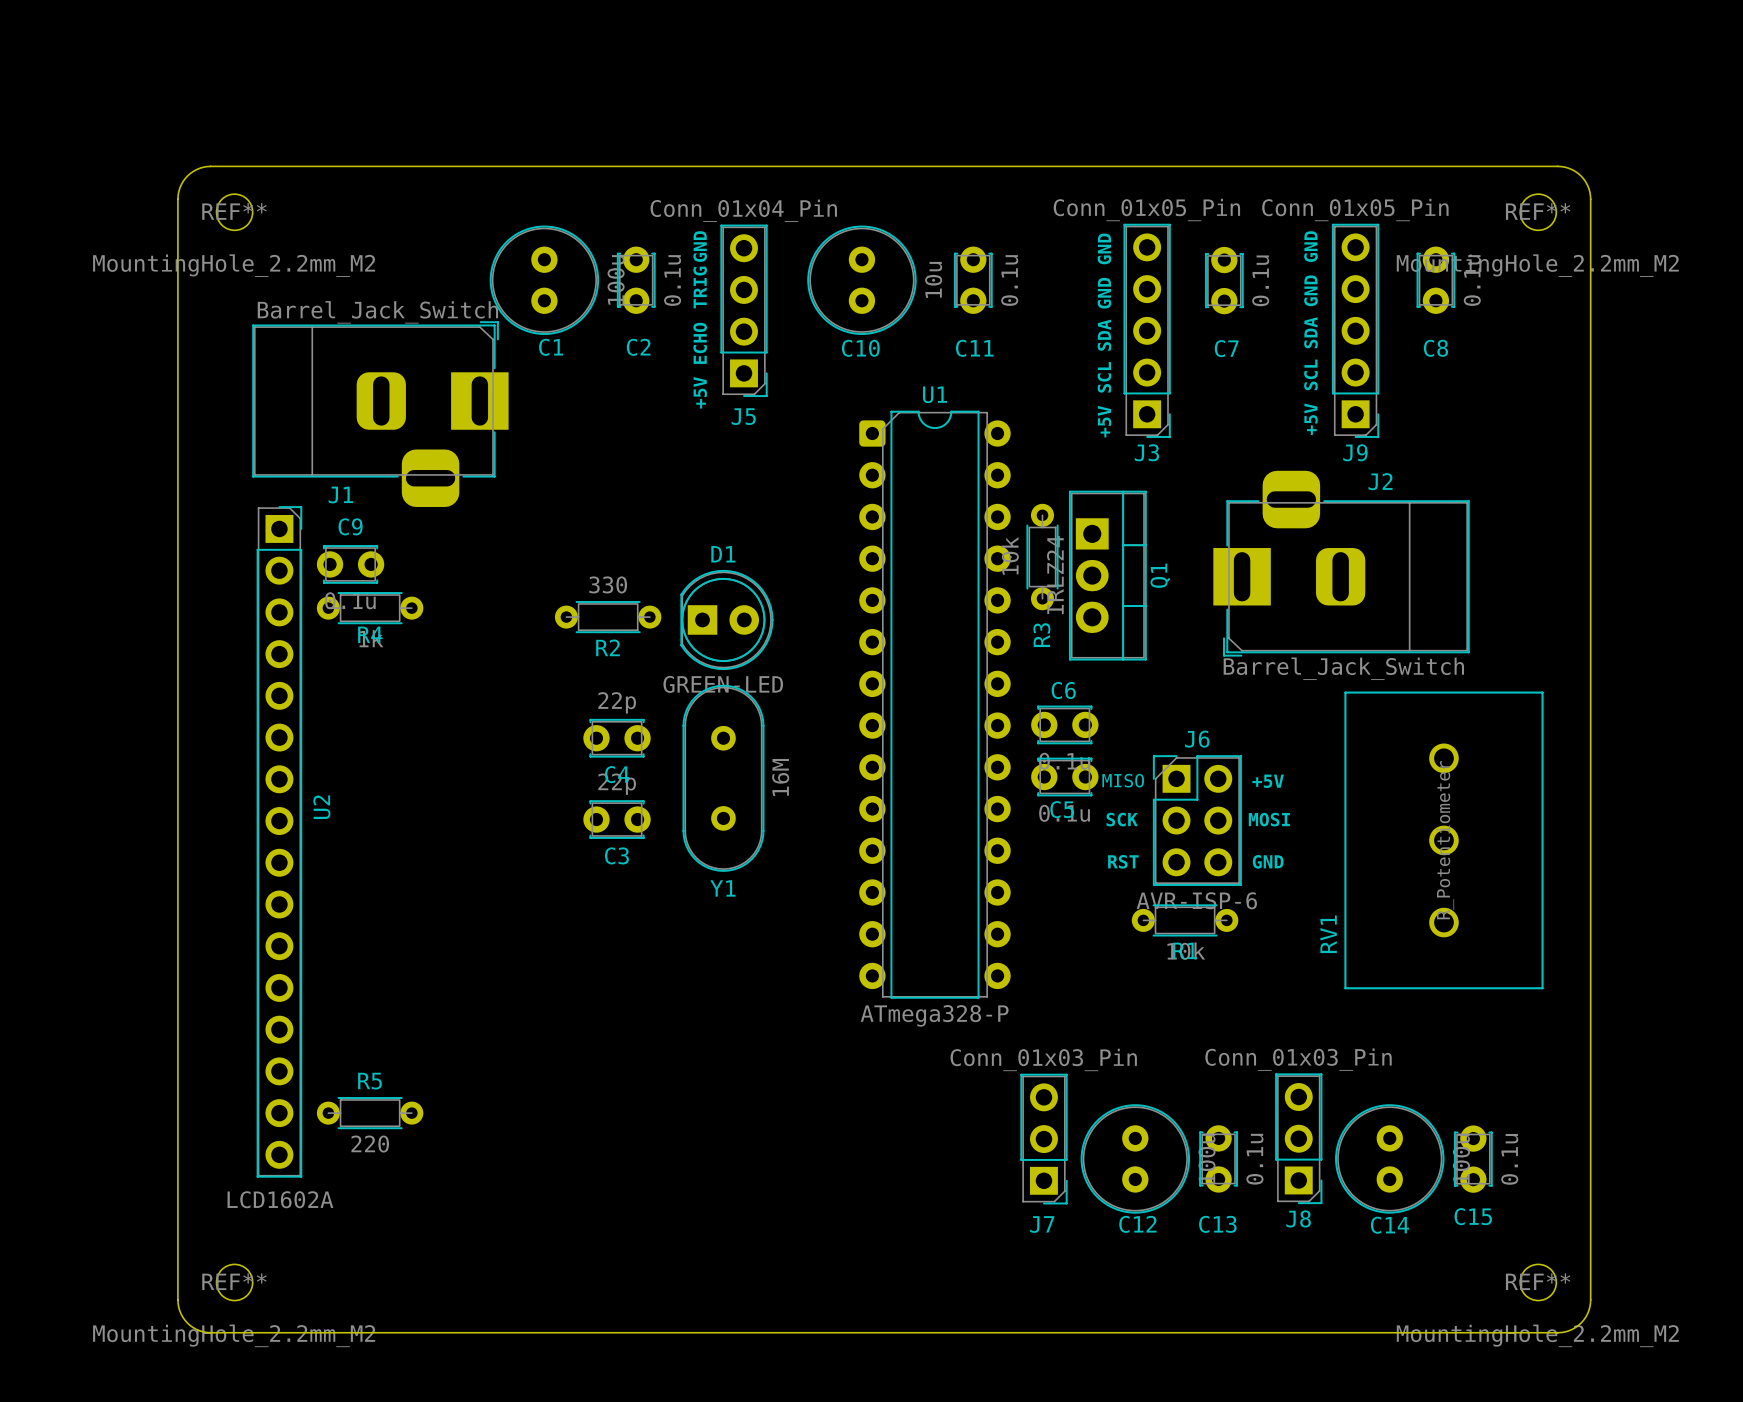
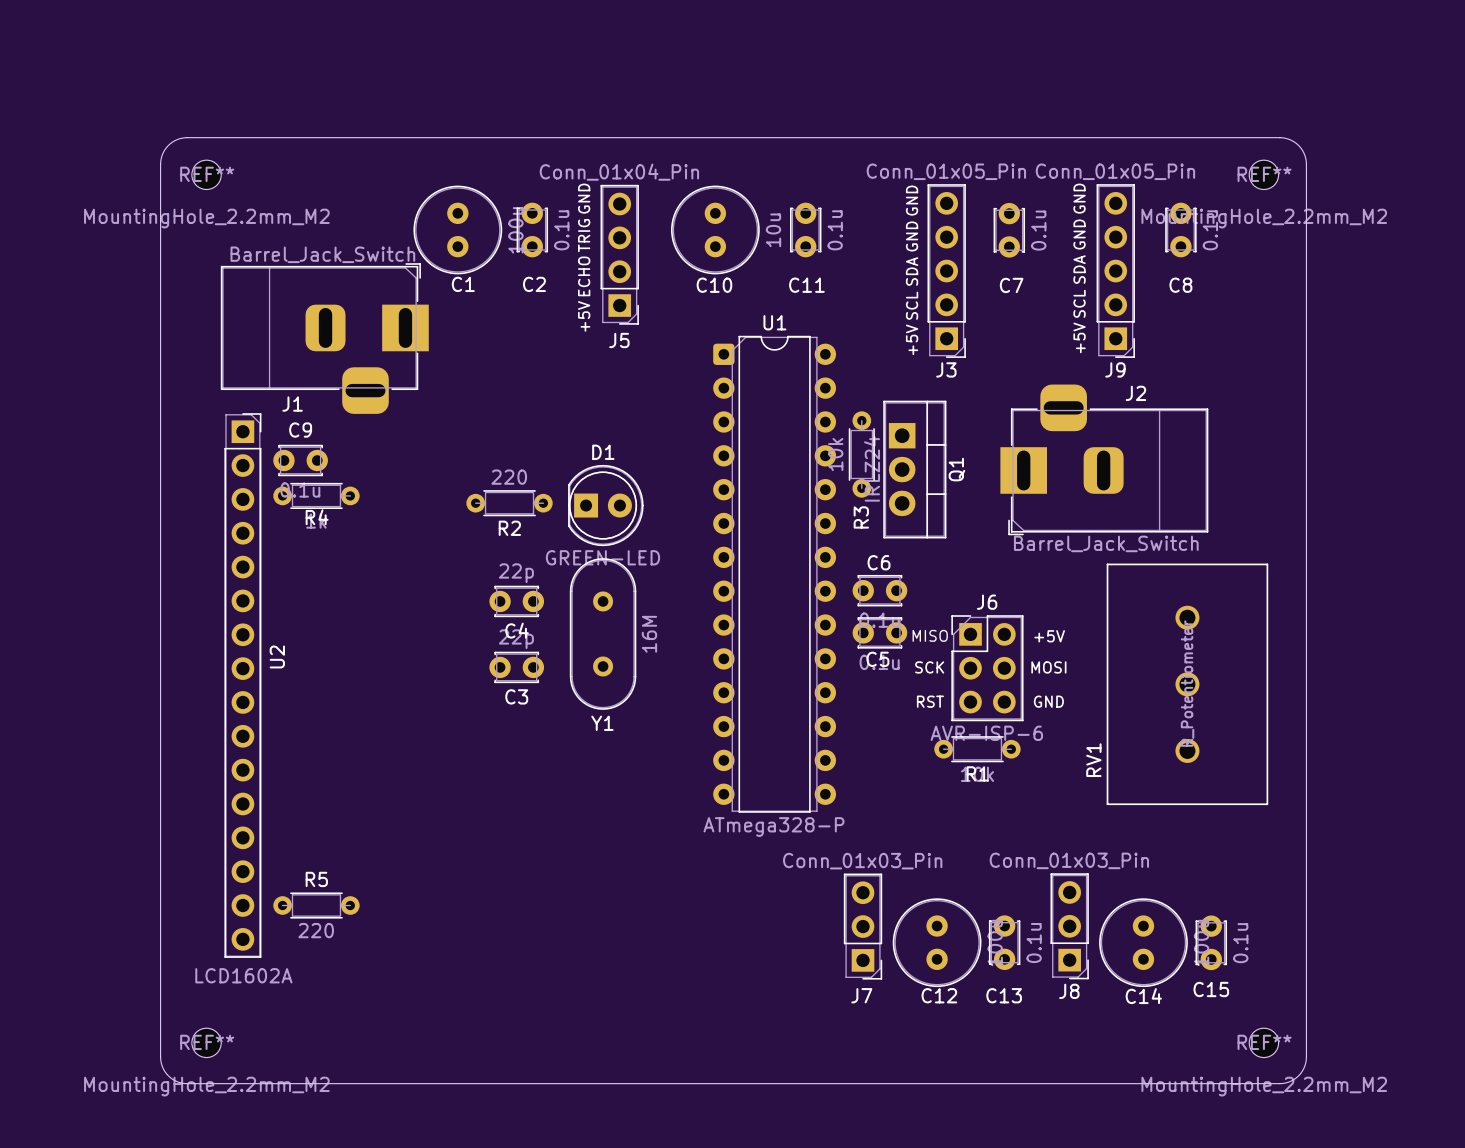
R2 value: 330 (608, 584) -> 220 (509, 477)

